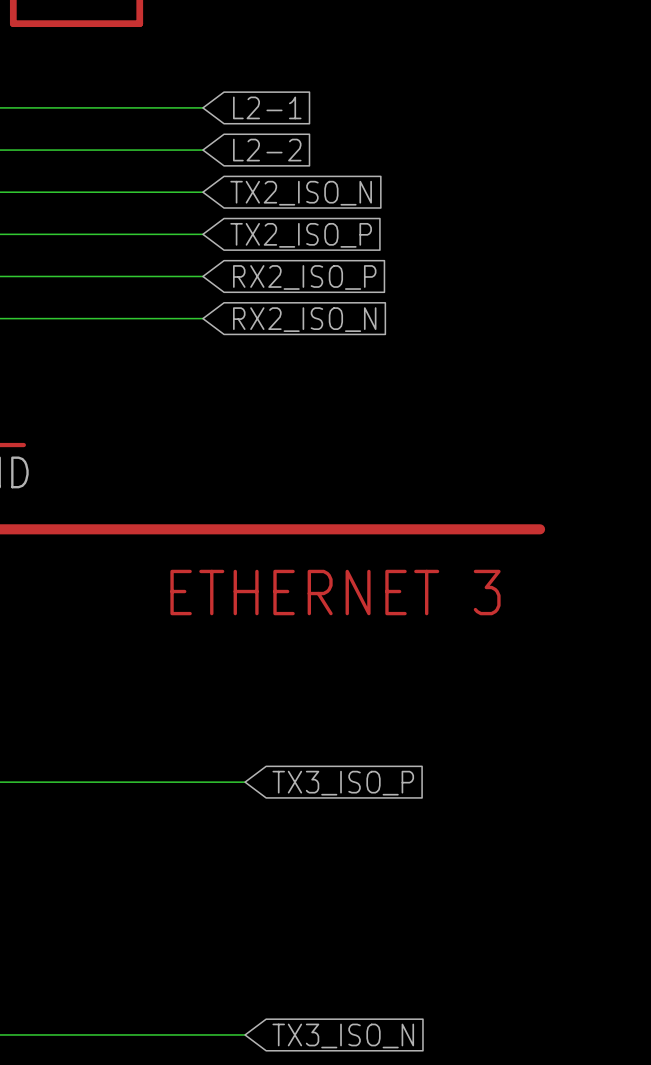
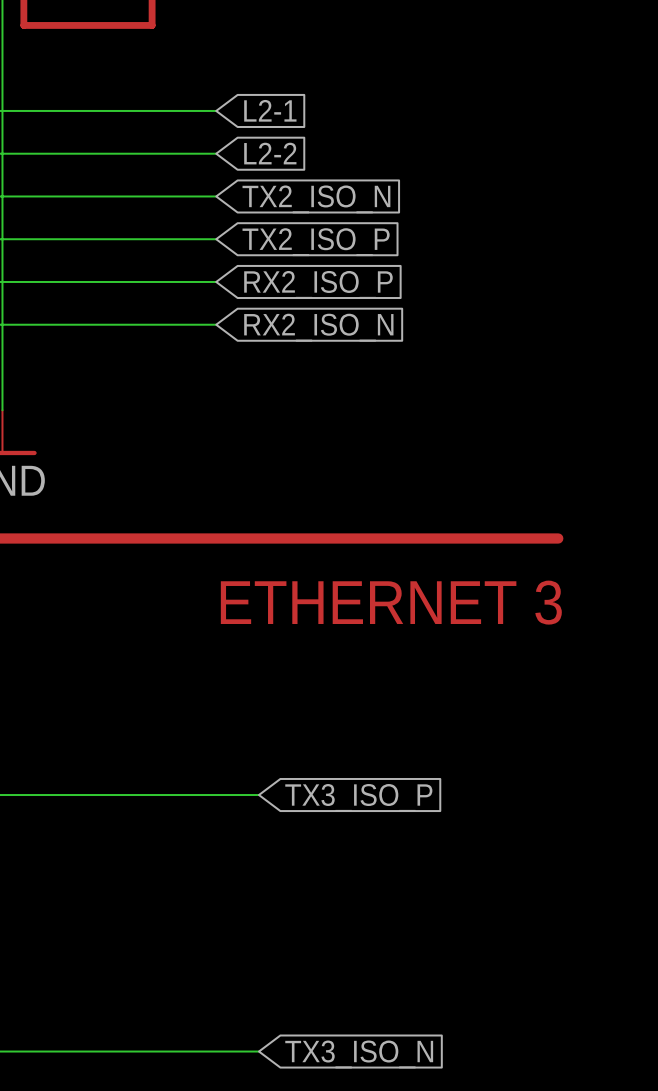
text position: ETHERNET 3 (335, 592) -> ETHERNET 3 (391, 602)

